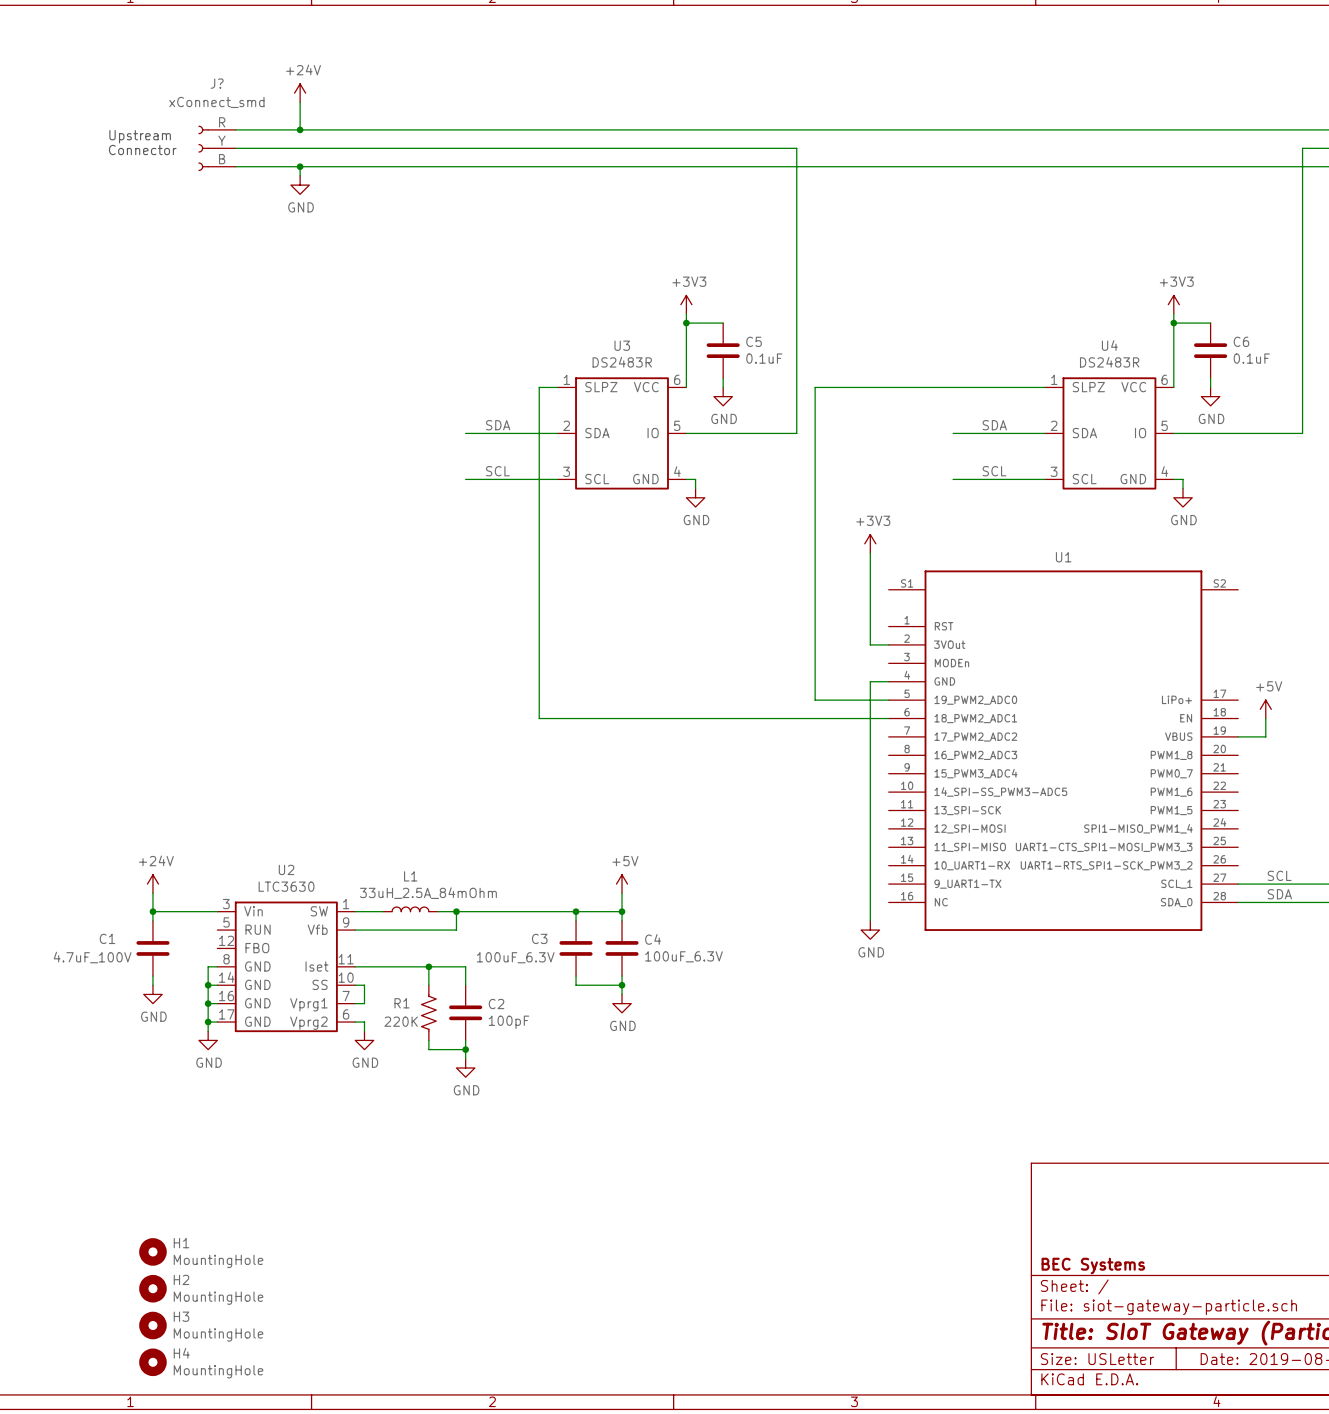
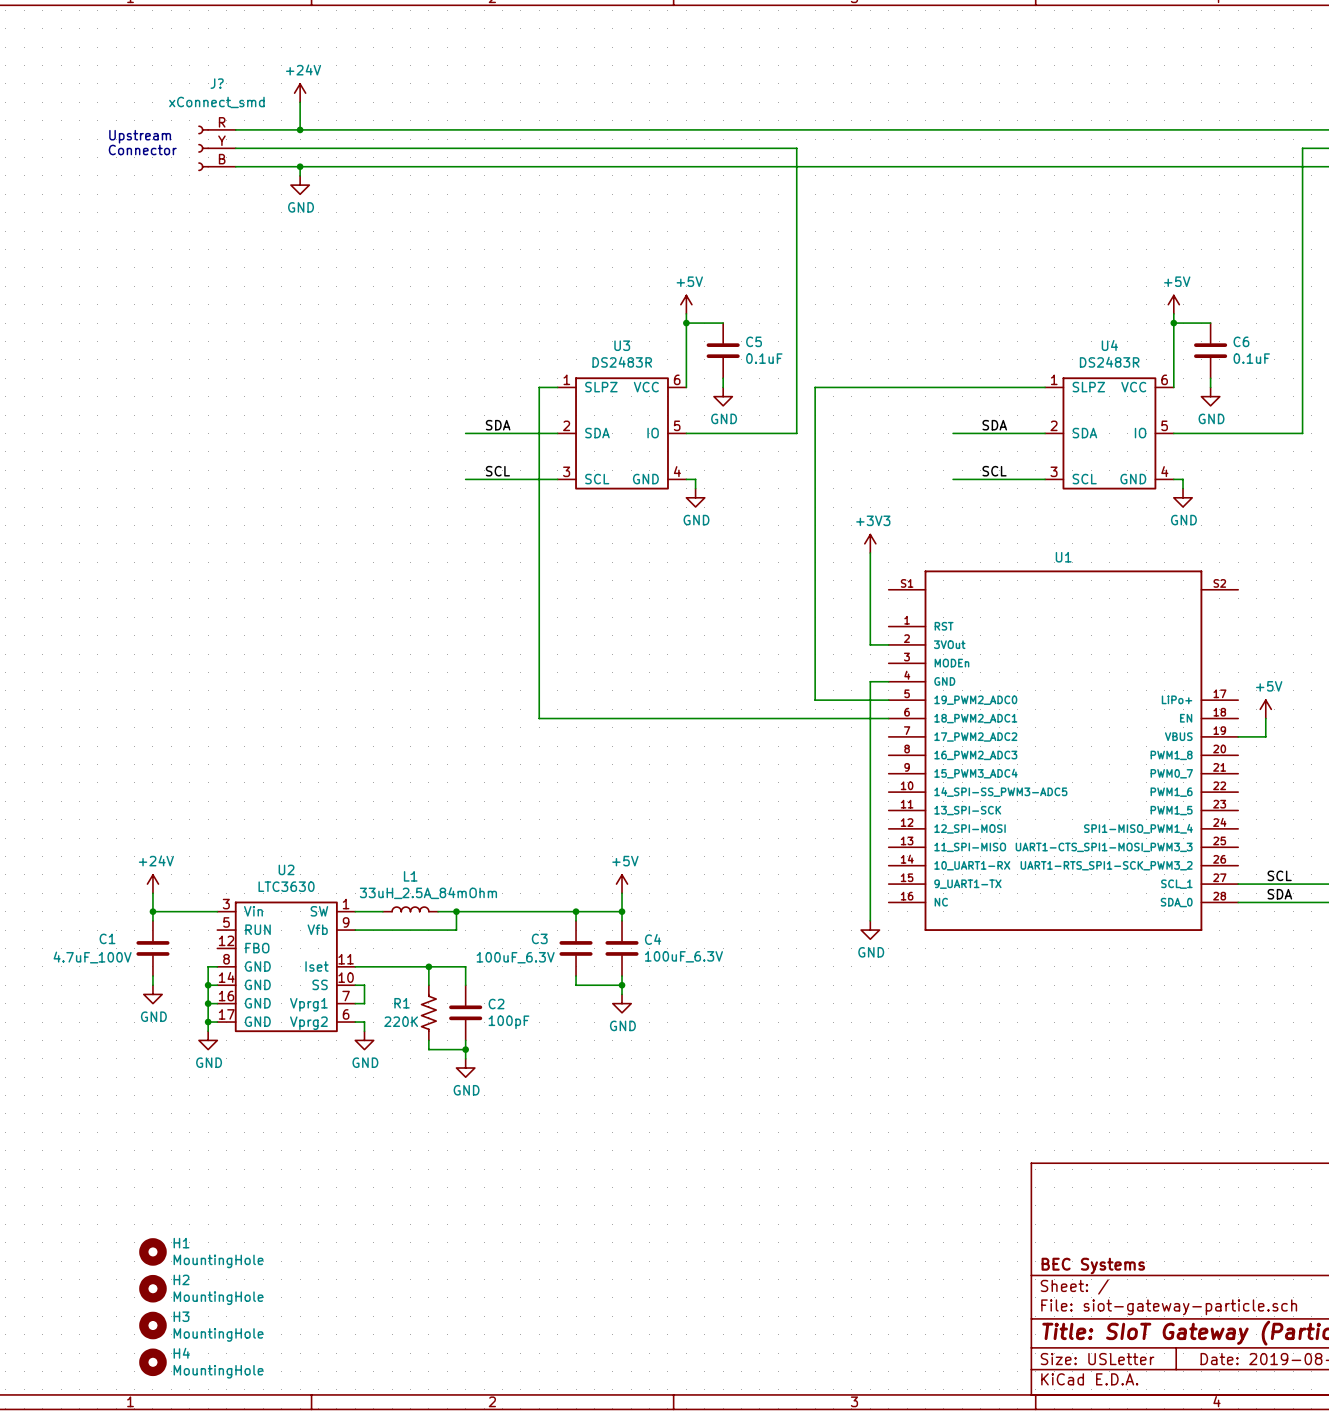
power symbol: +3V3 (686, 304) -> +5V (686, 304)
power symbol: +3V3 (1173, 304) -> +5V (1173, 304)

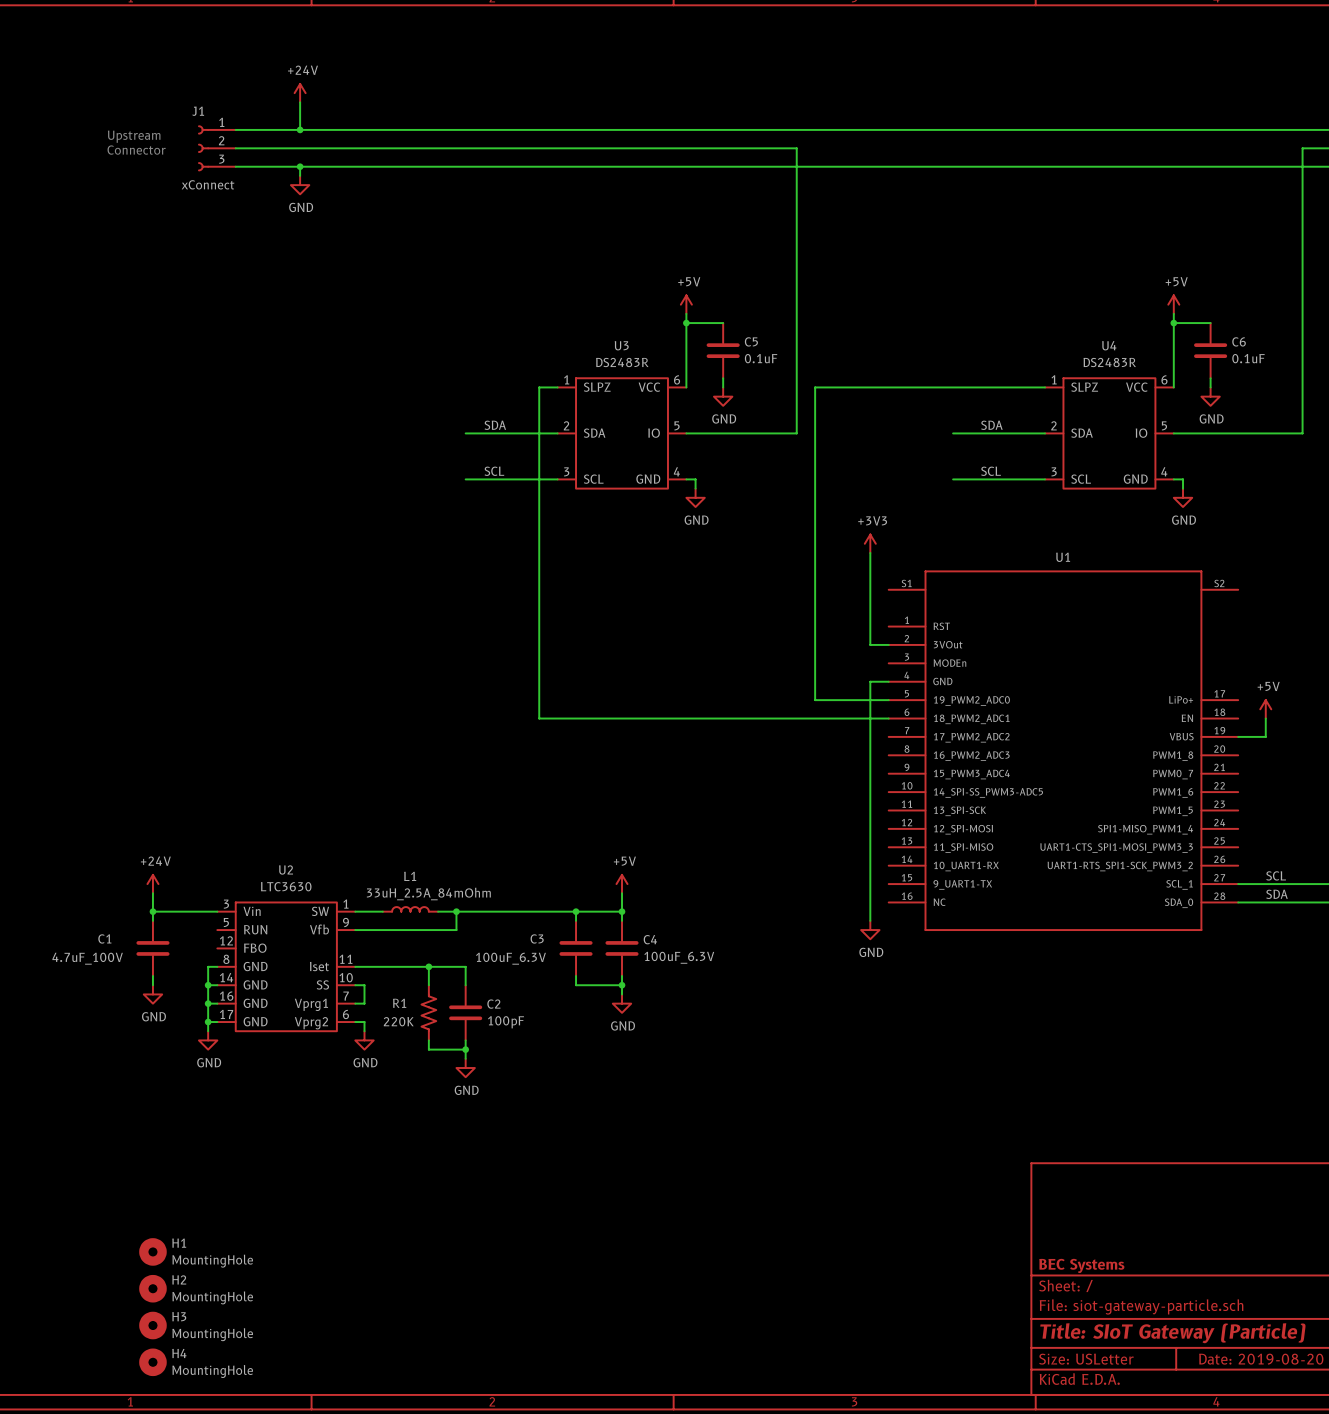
J? name: J? (217, 83) -> J1 (198, 111)
J? value: xConnect_smd (216, 102) -> xConnect (208, 184)
J? pin number: R (222, 122) -> 1 (221, 122)
J? pin number: Y (221, 140) -> 2 (221, 140)
J? pin number: B (222, 159) -> 3 (221, 159)

